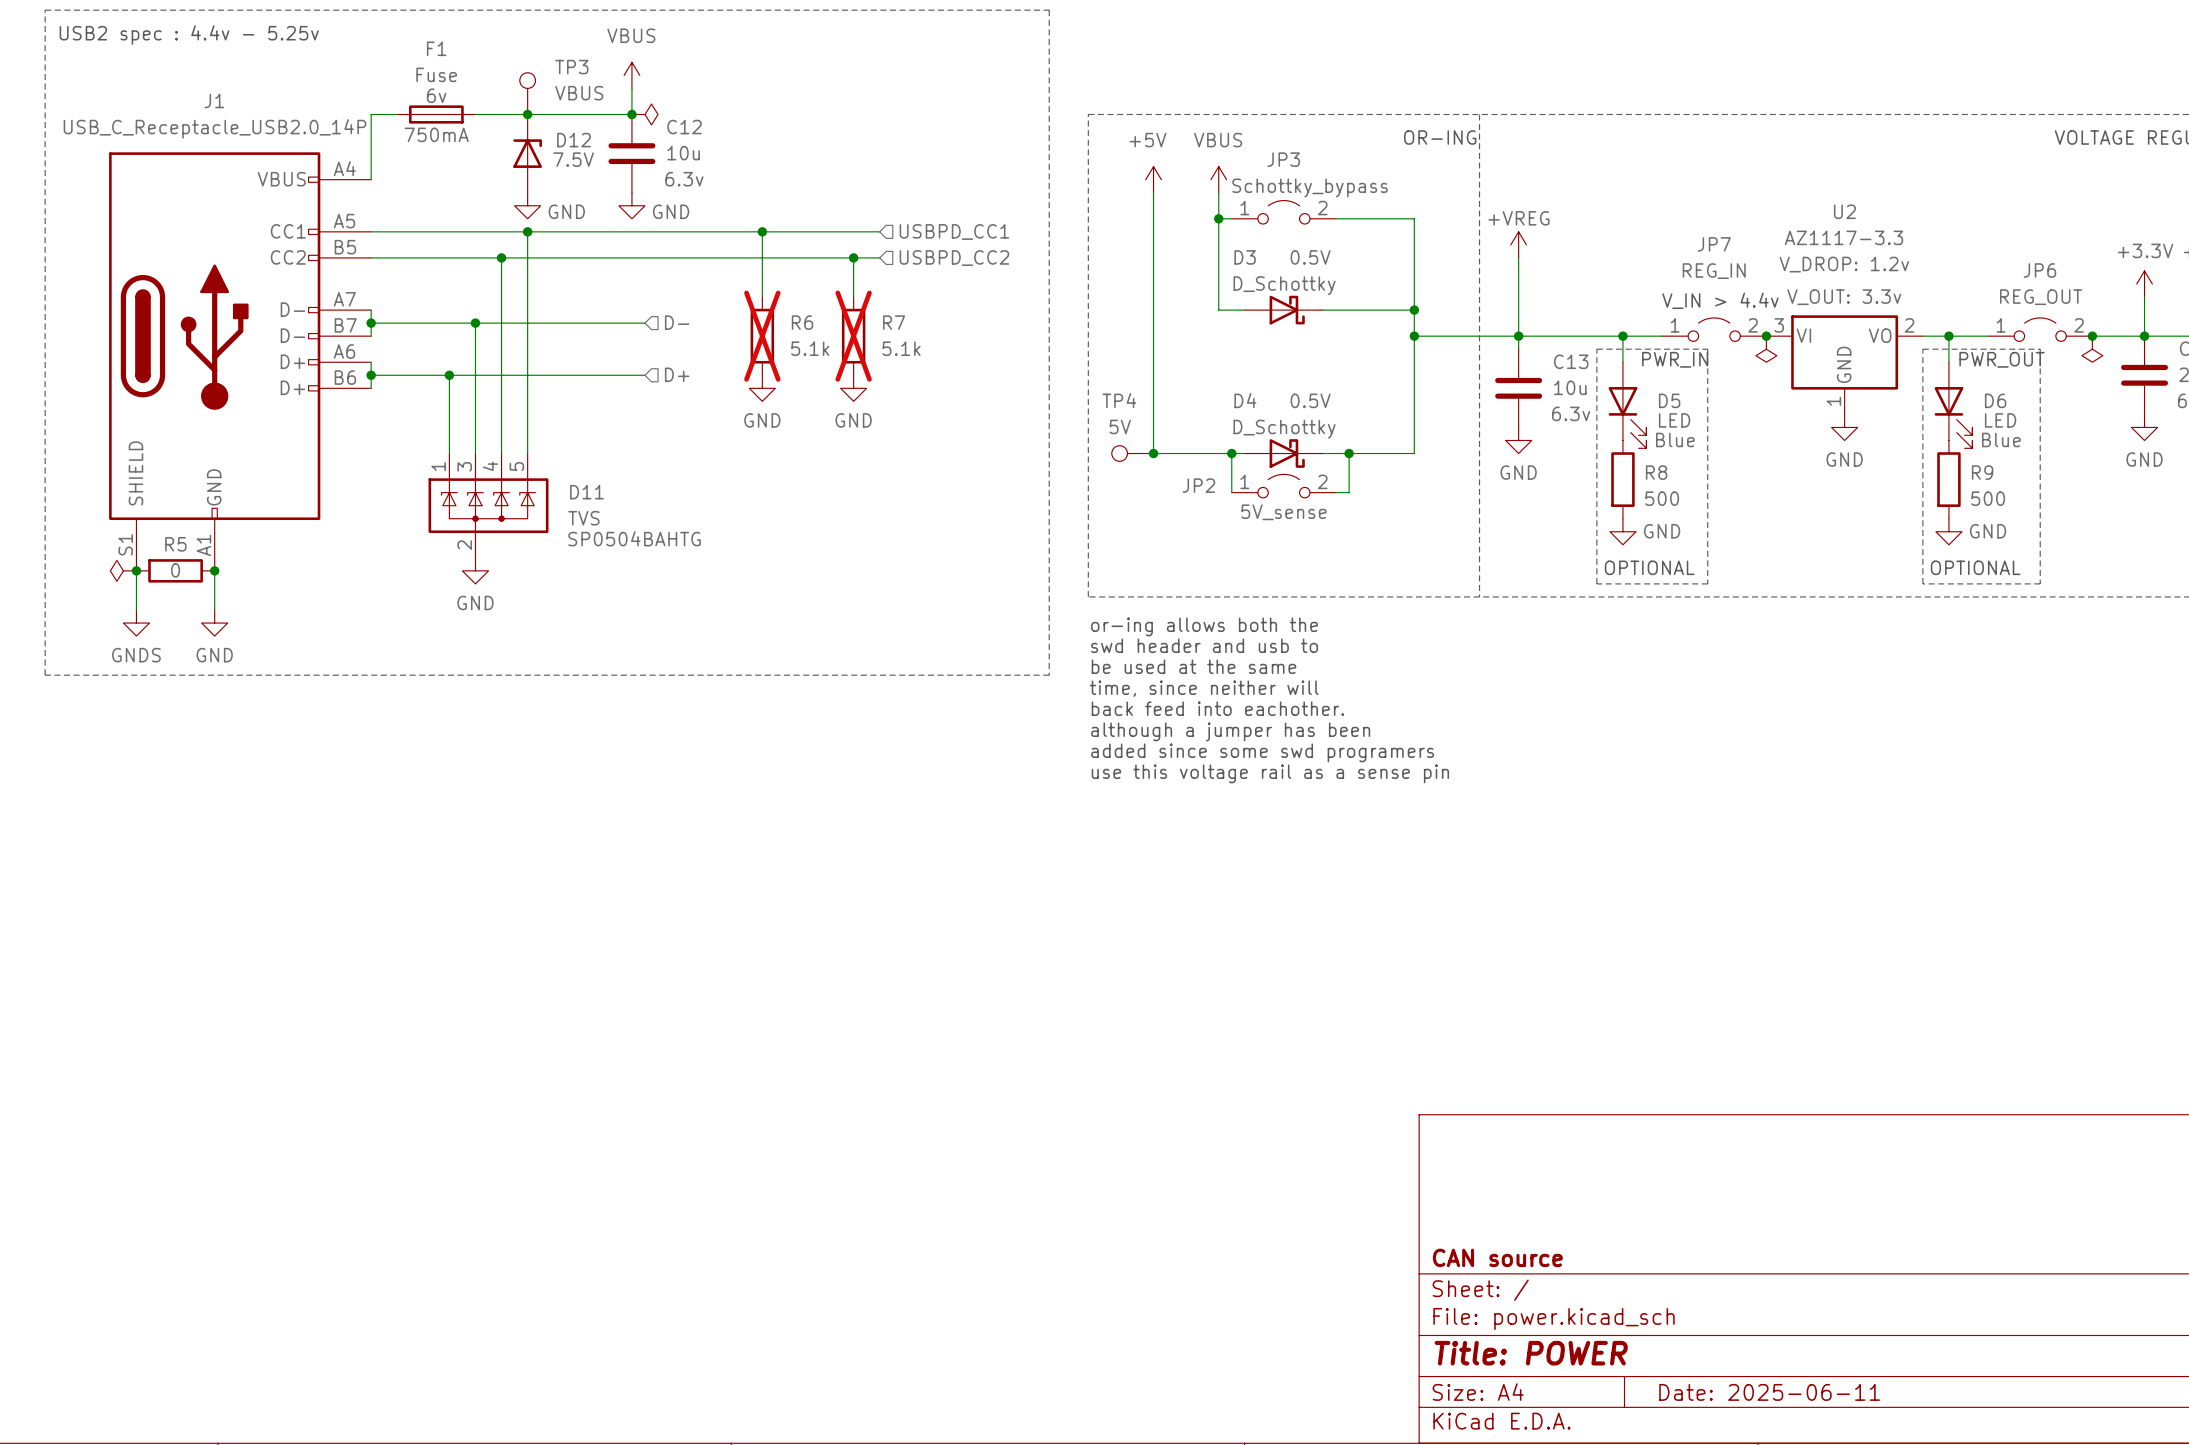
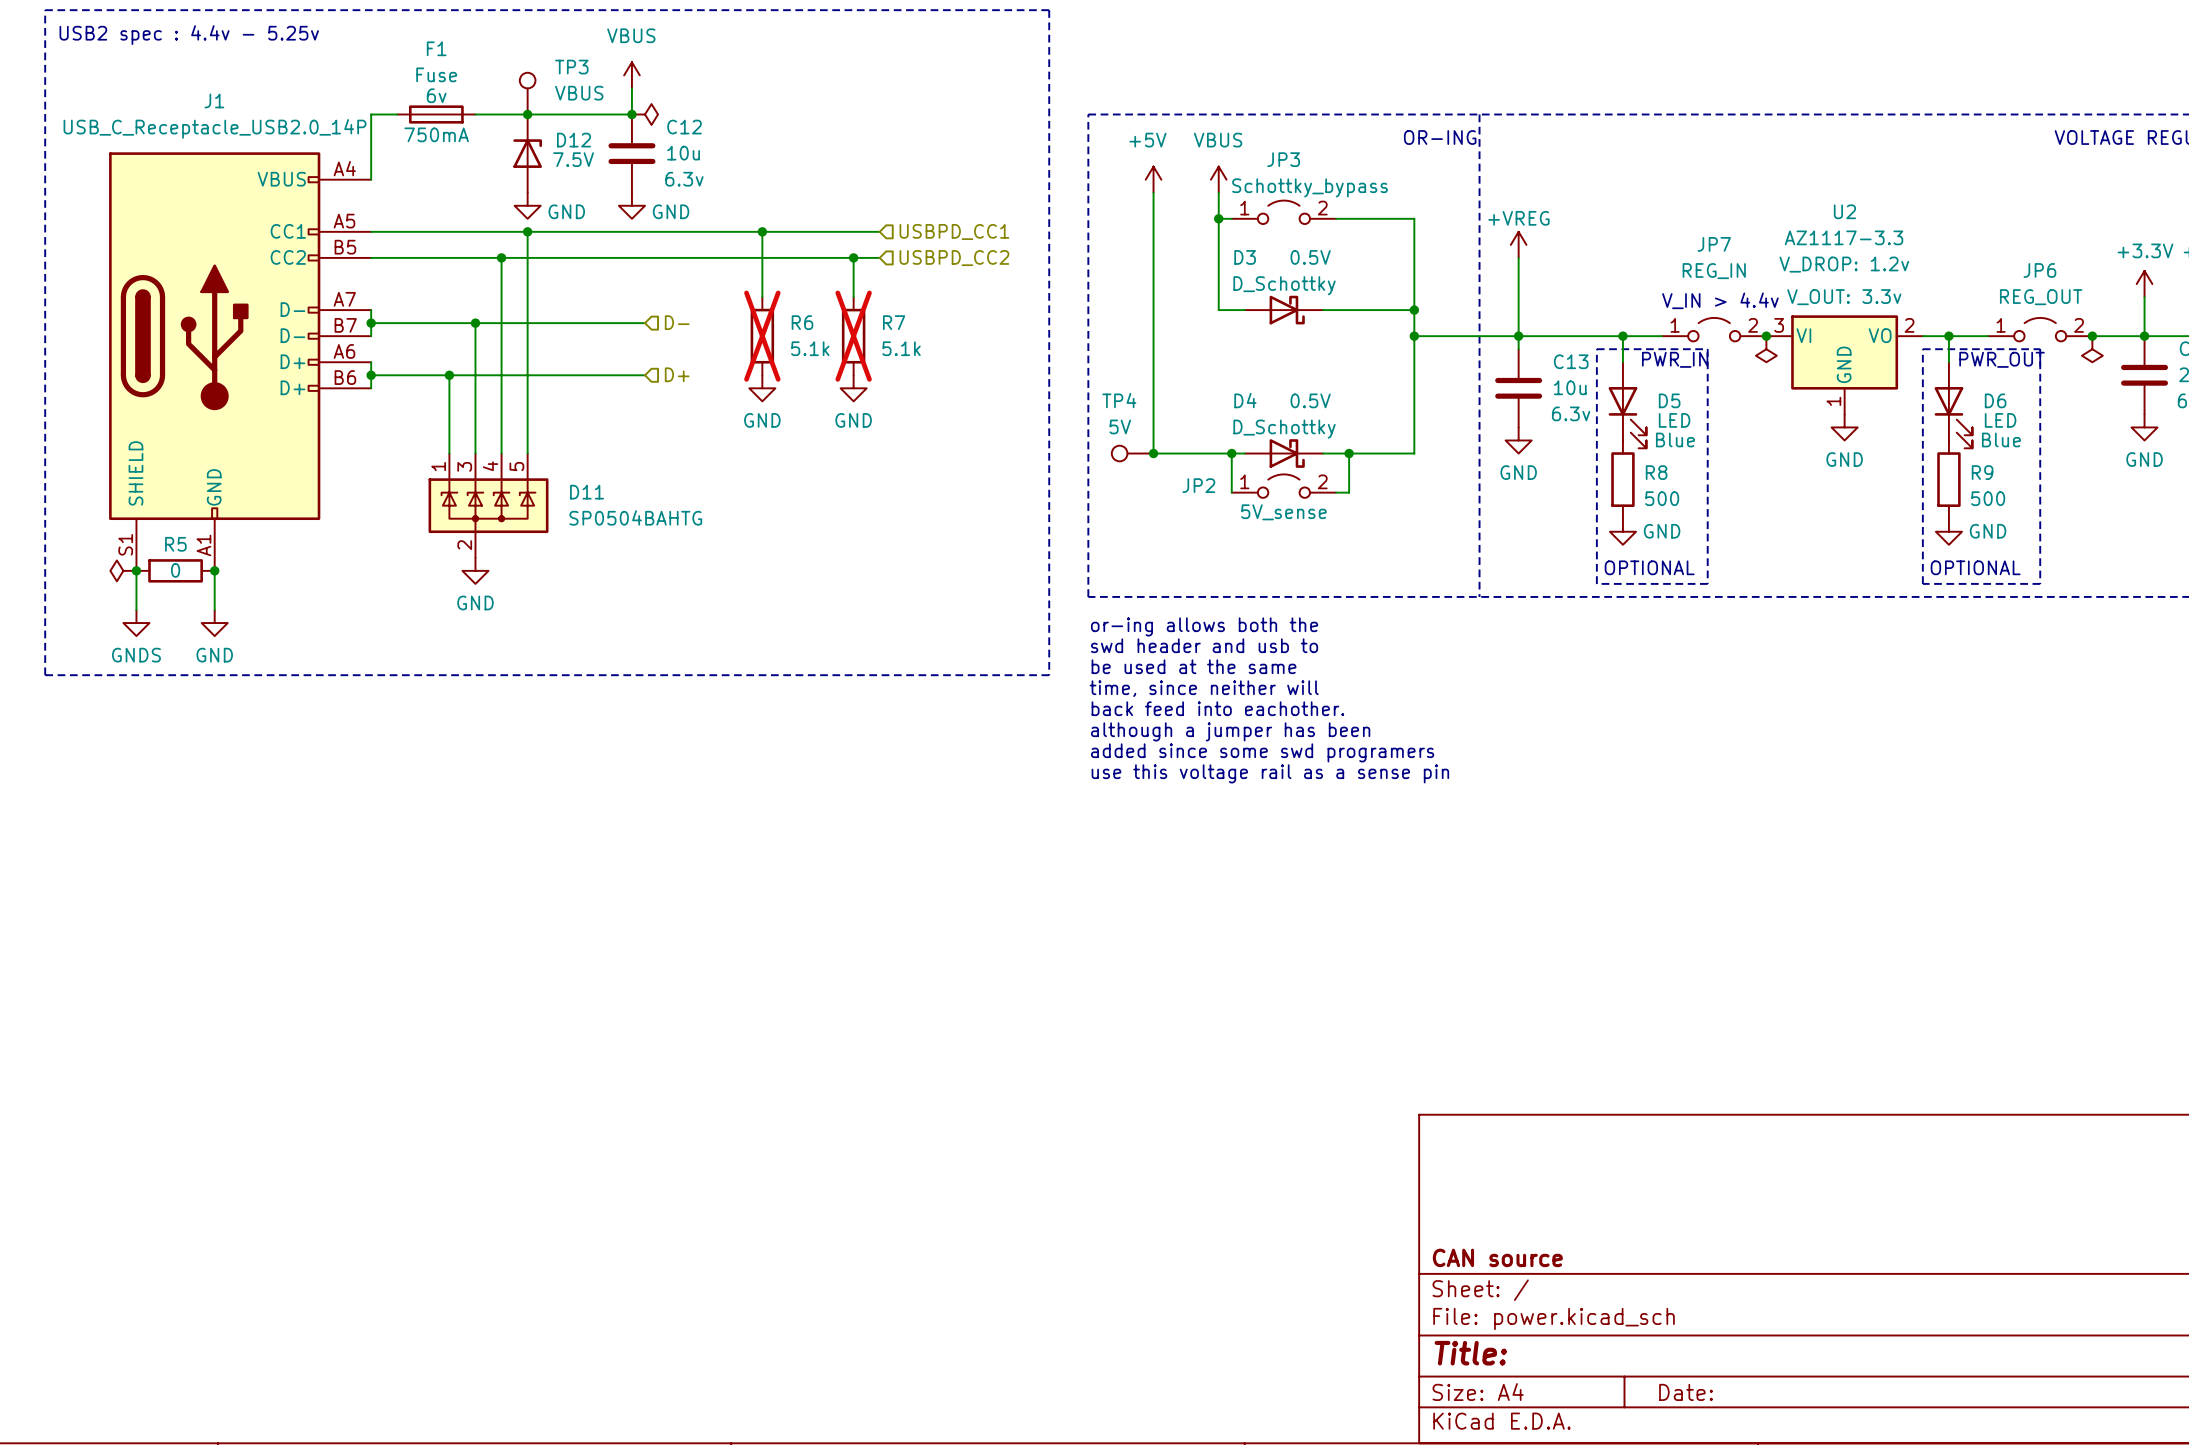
D11 value: TVS (583, 518) -> SP0504BAHTG (635, 517)
D11 text: SP0504BAHTG (634, 538) -> none
title block: Title: POWER (1531, 1353) -> Title: (1470, 1353)
title block: Date: 2025-06-11 (1769, 1392) -> Date: (1686, 1392)

